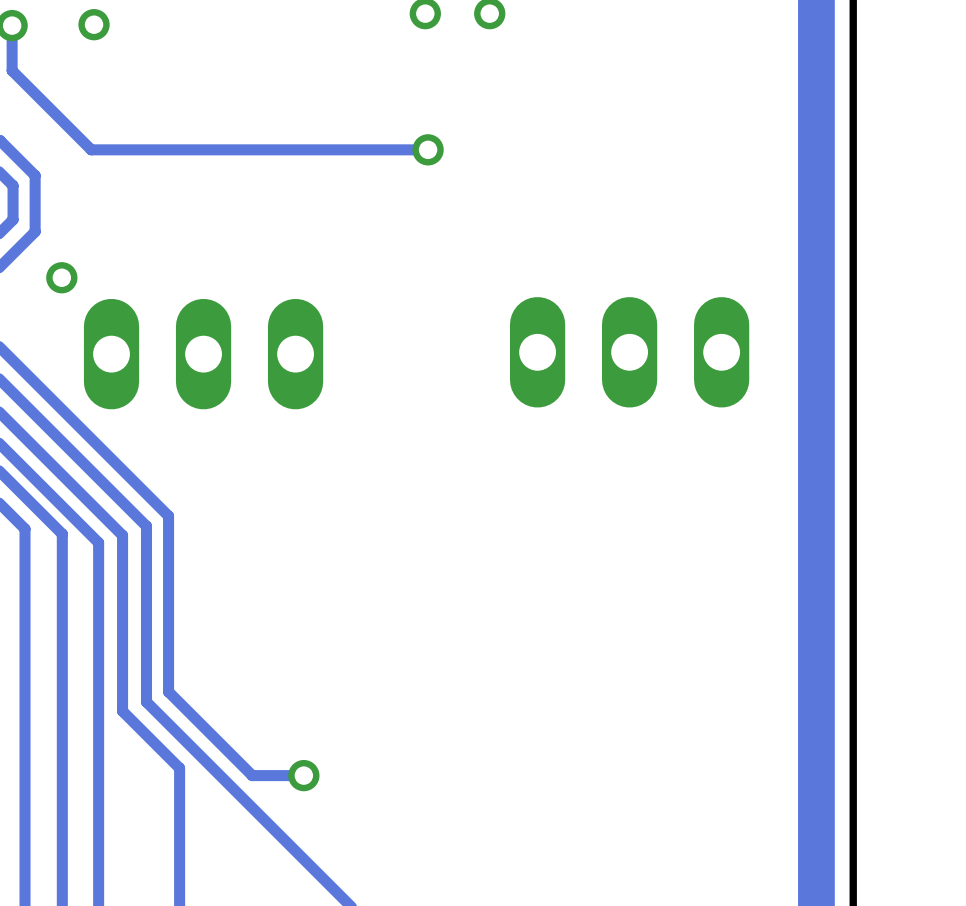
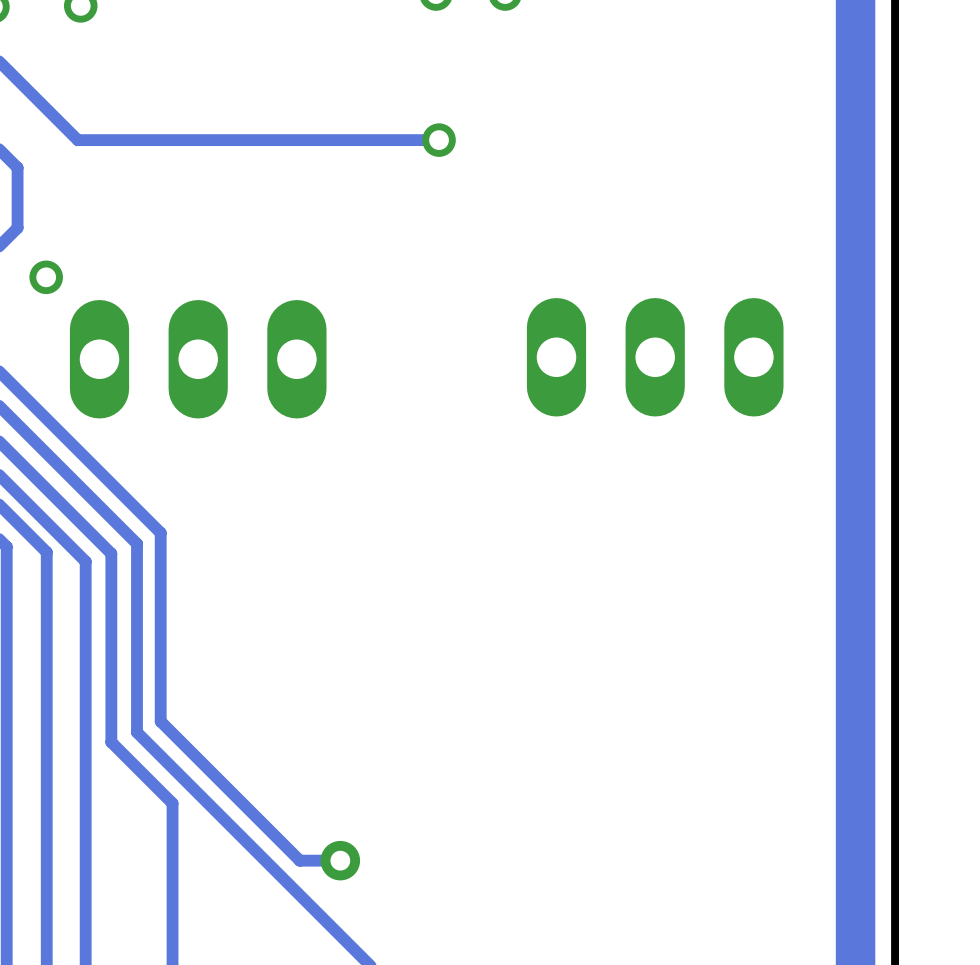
track: (303, 775) (252, 775) -> (340, 860) (299, 860) (250, 811)
via: (303, 775) -> none
via: none -> (340, 860)

